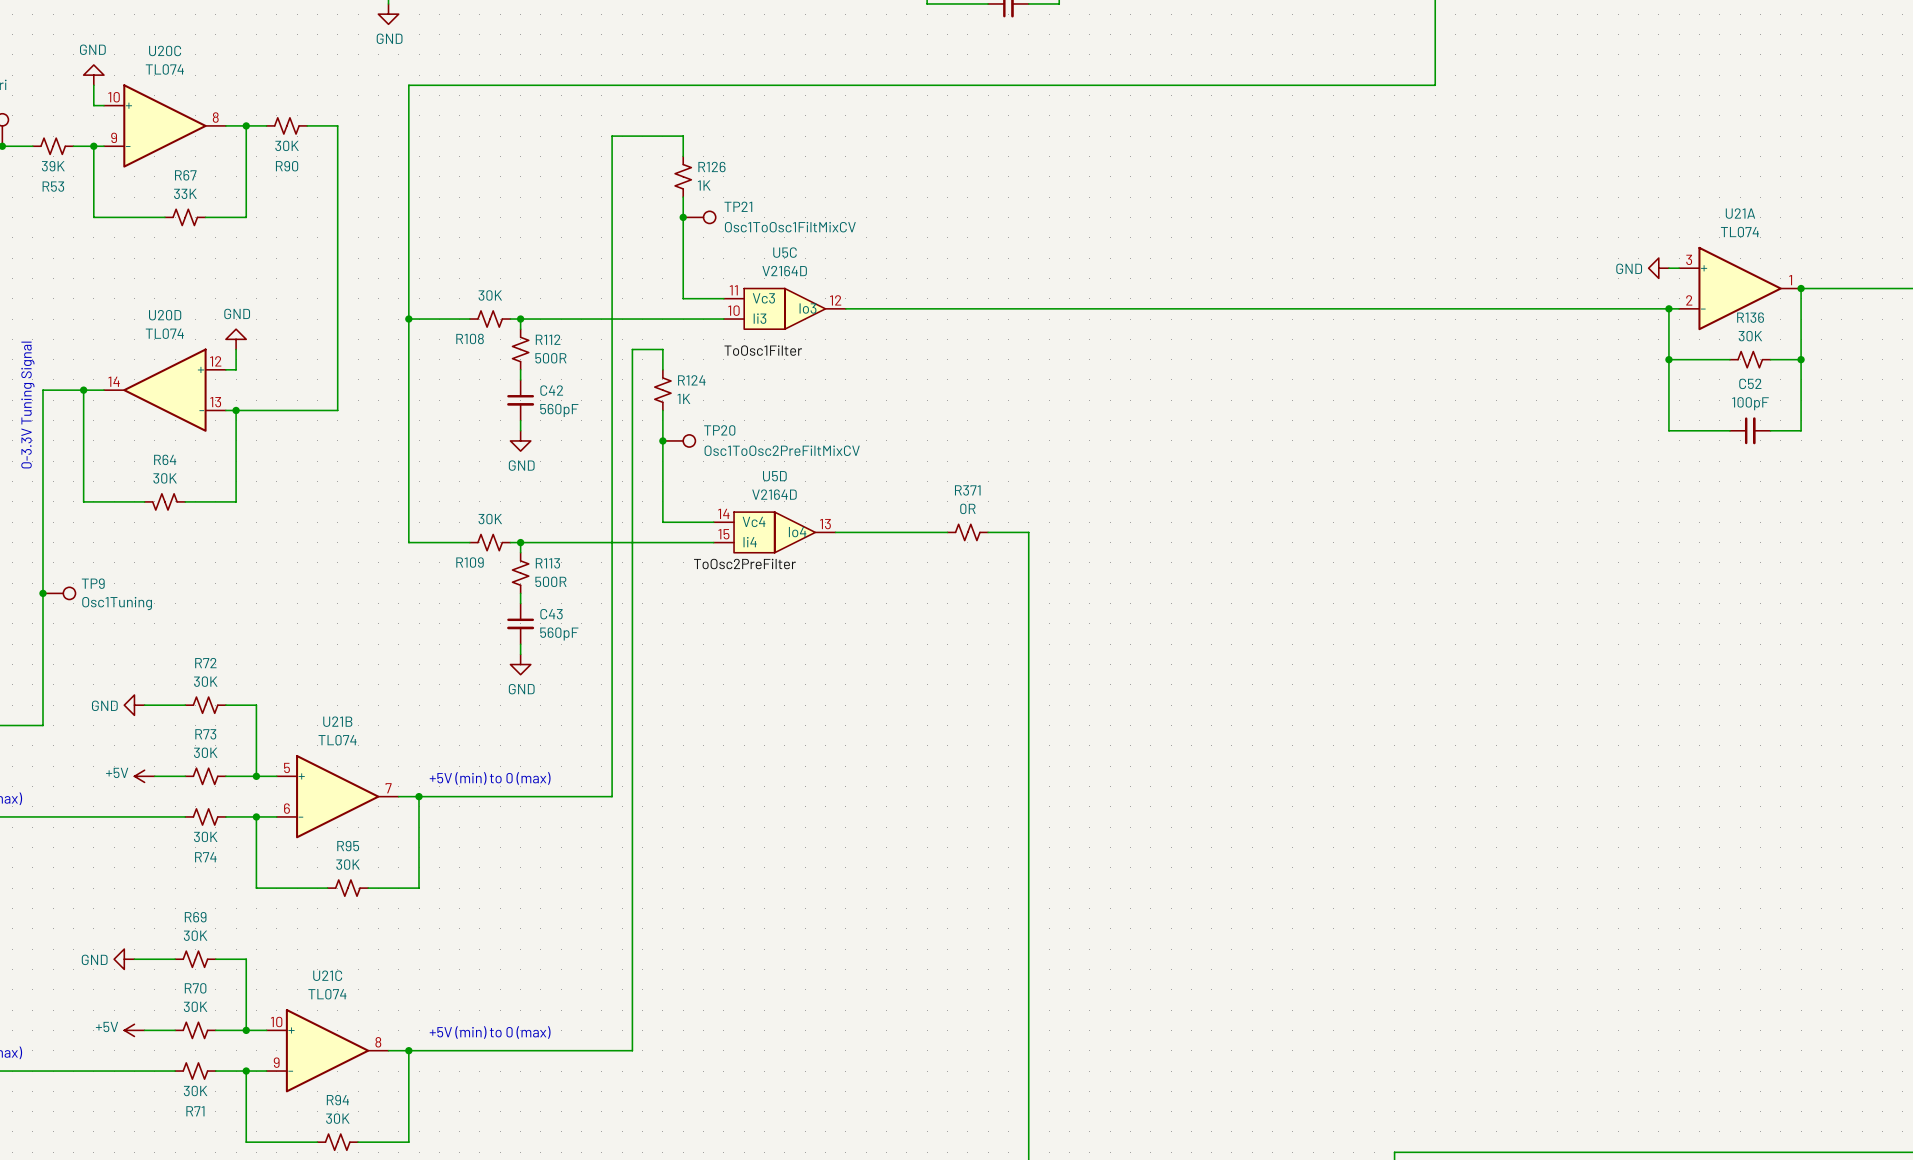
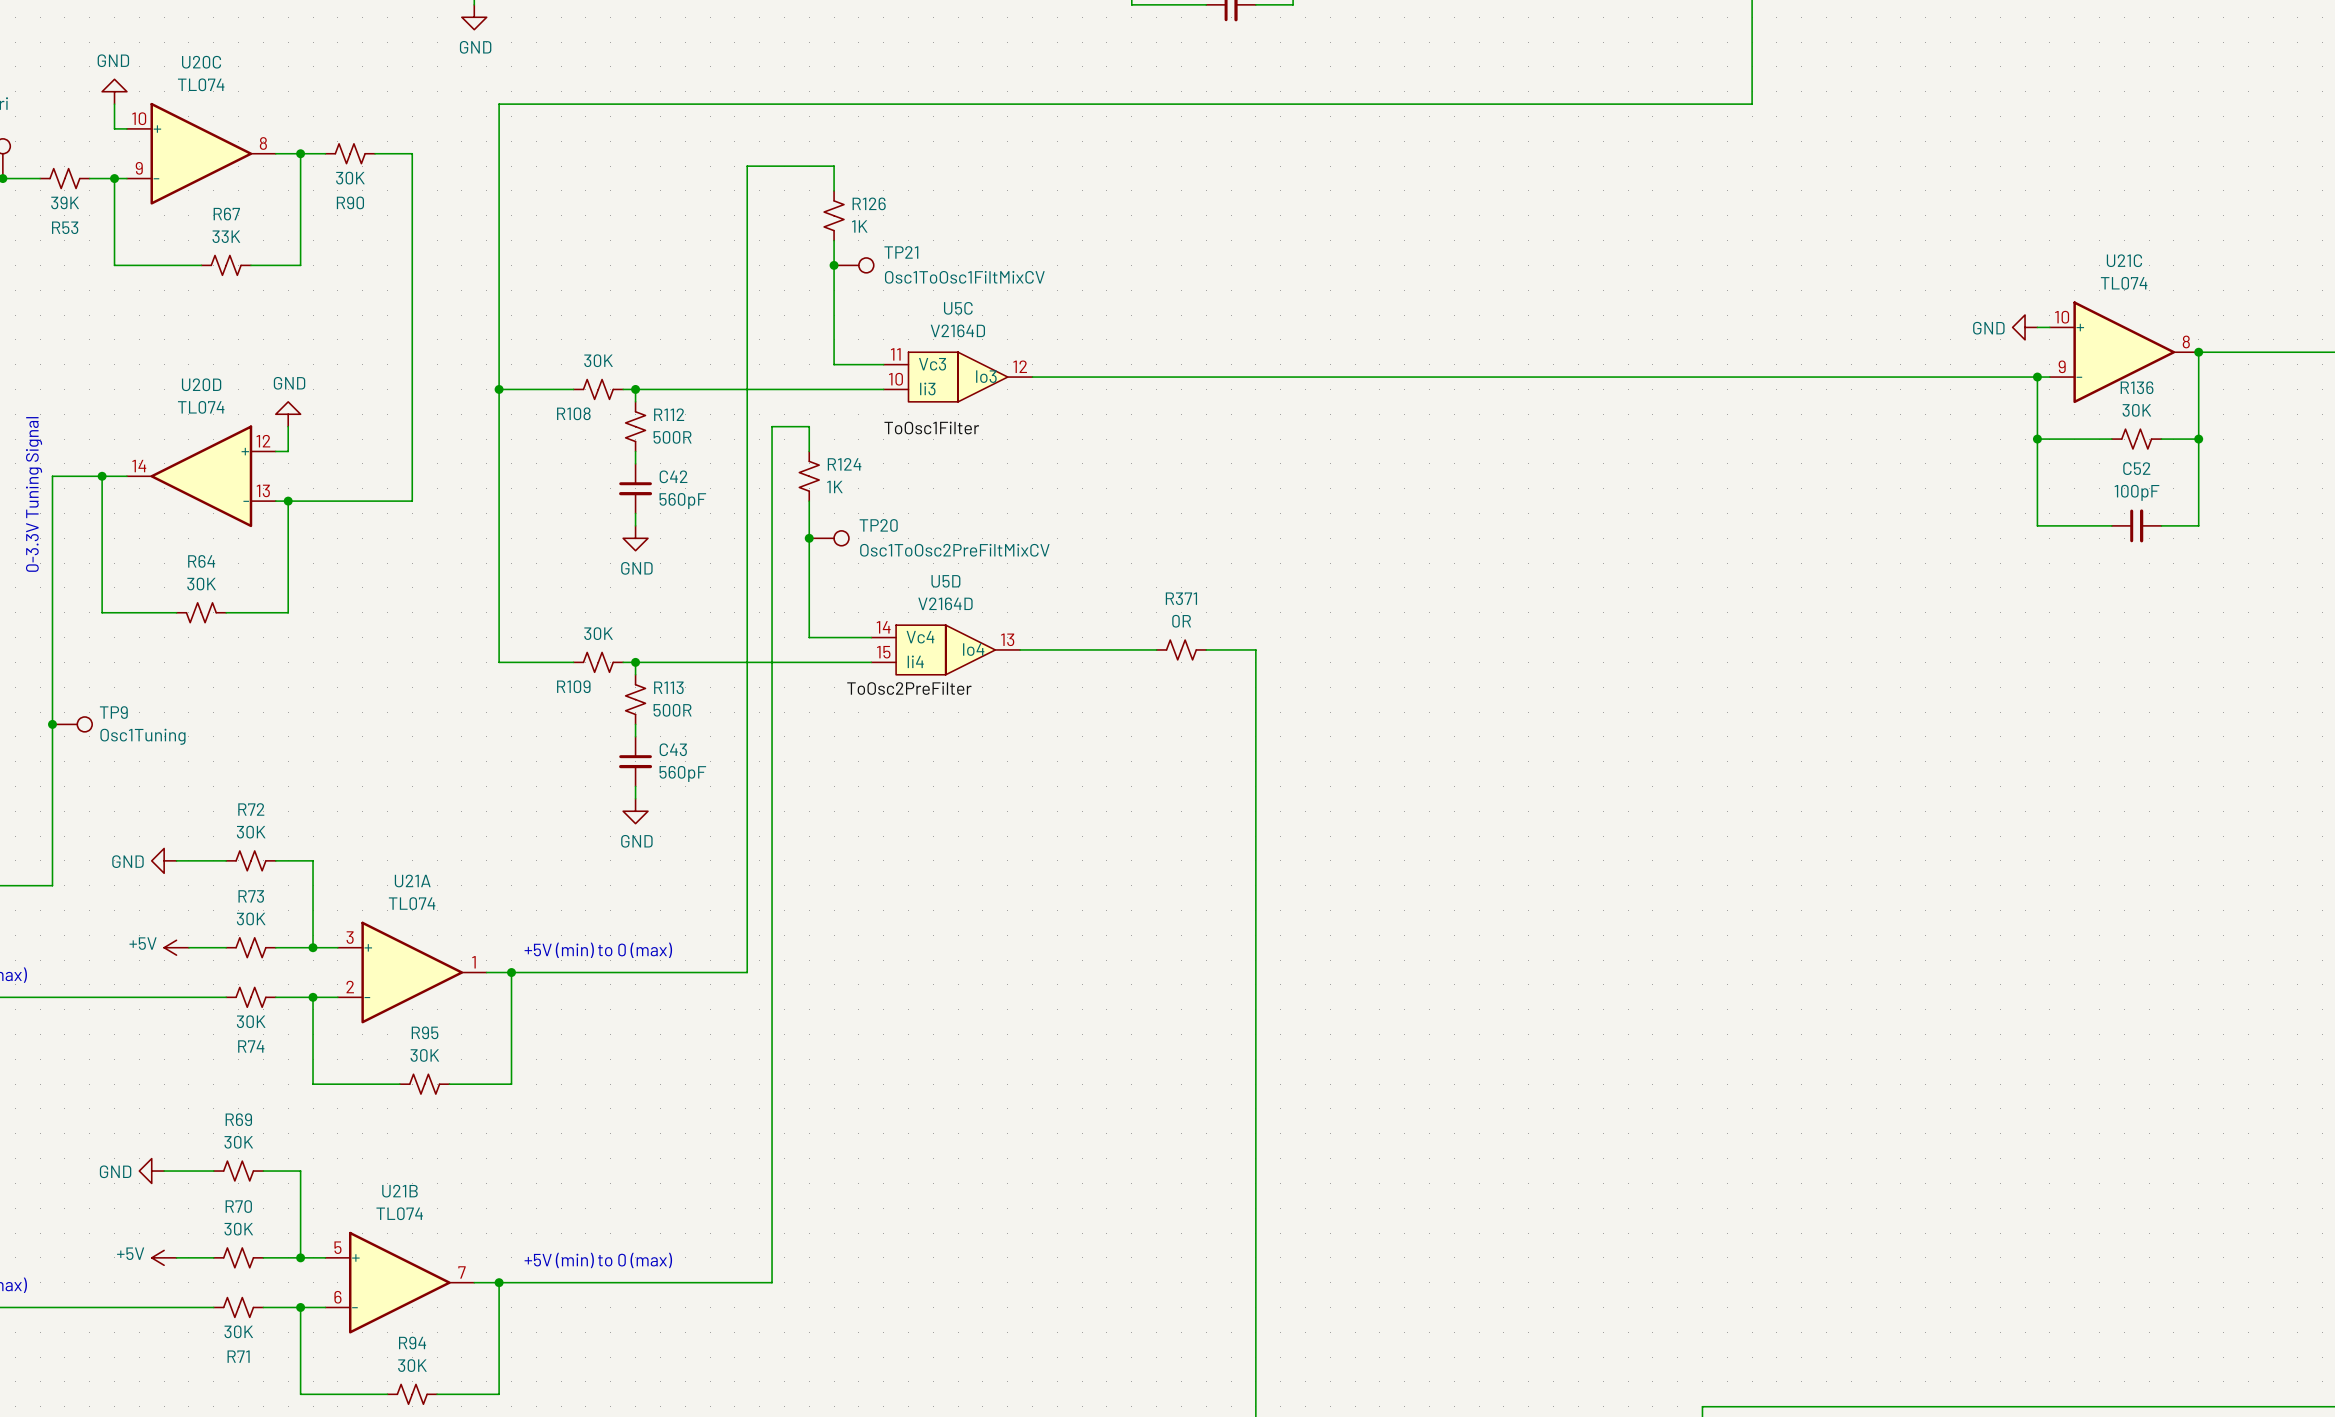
U21A position: (1740, 288) -> (412, 972)
U21B position: (337, 796) -> (399, 1282)
U21C position: (327, 1050) -> (2124, 352)

